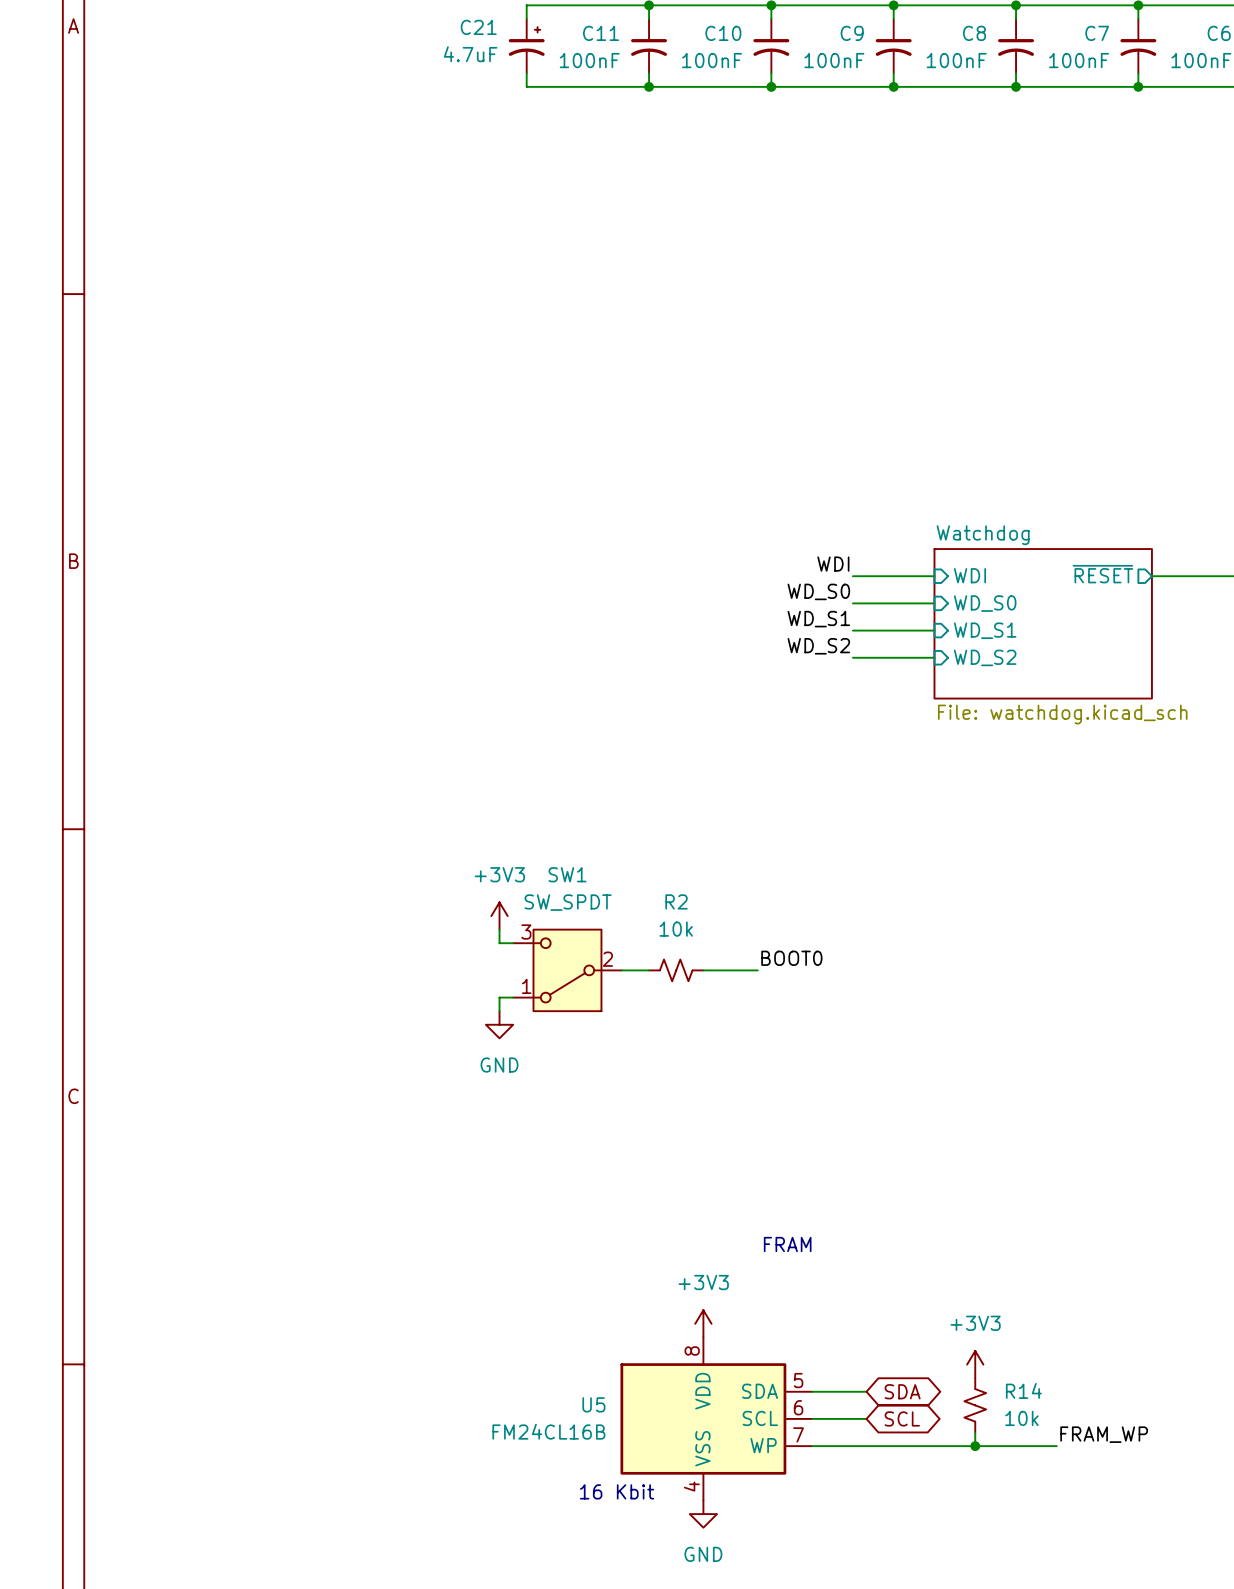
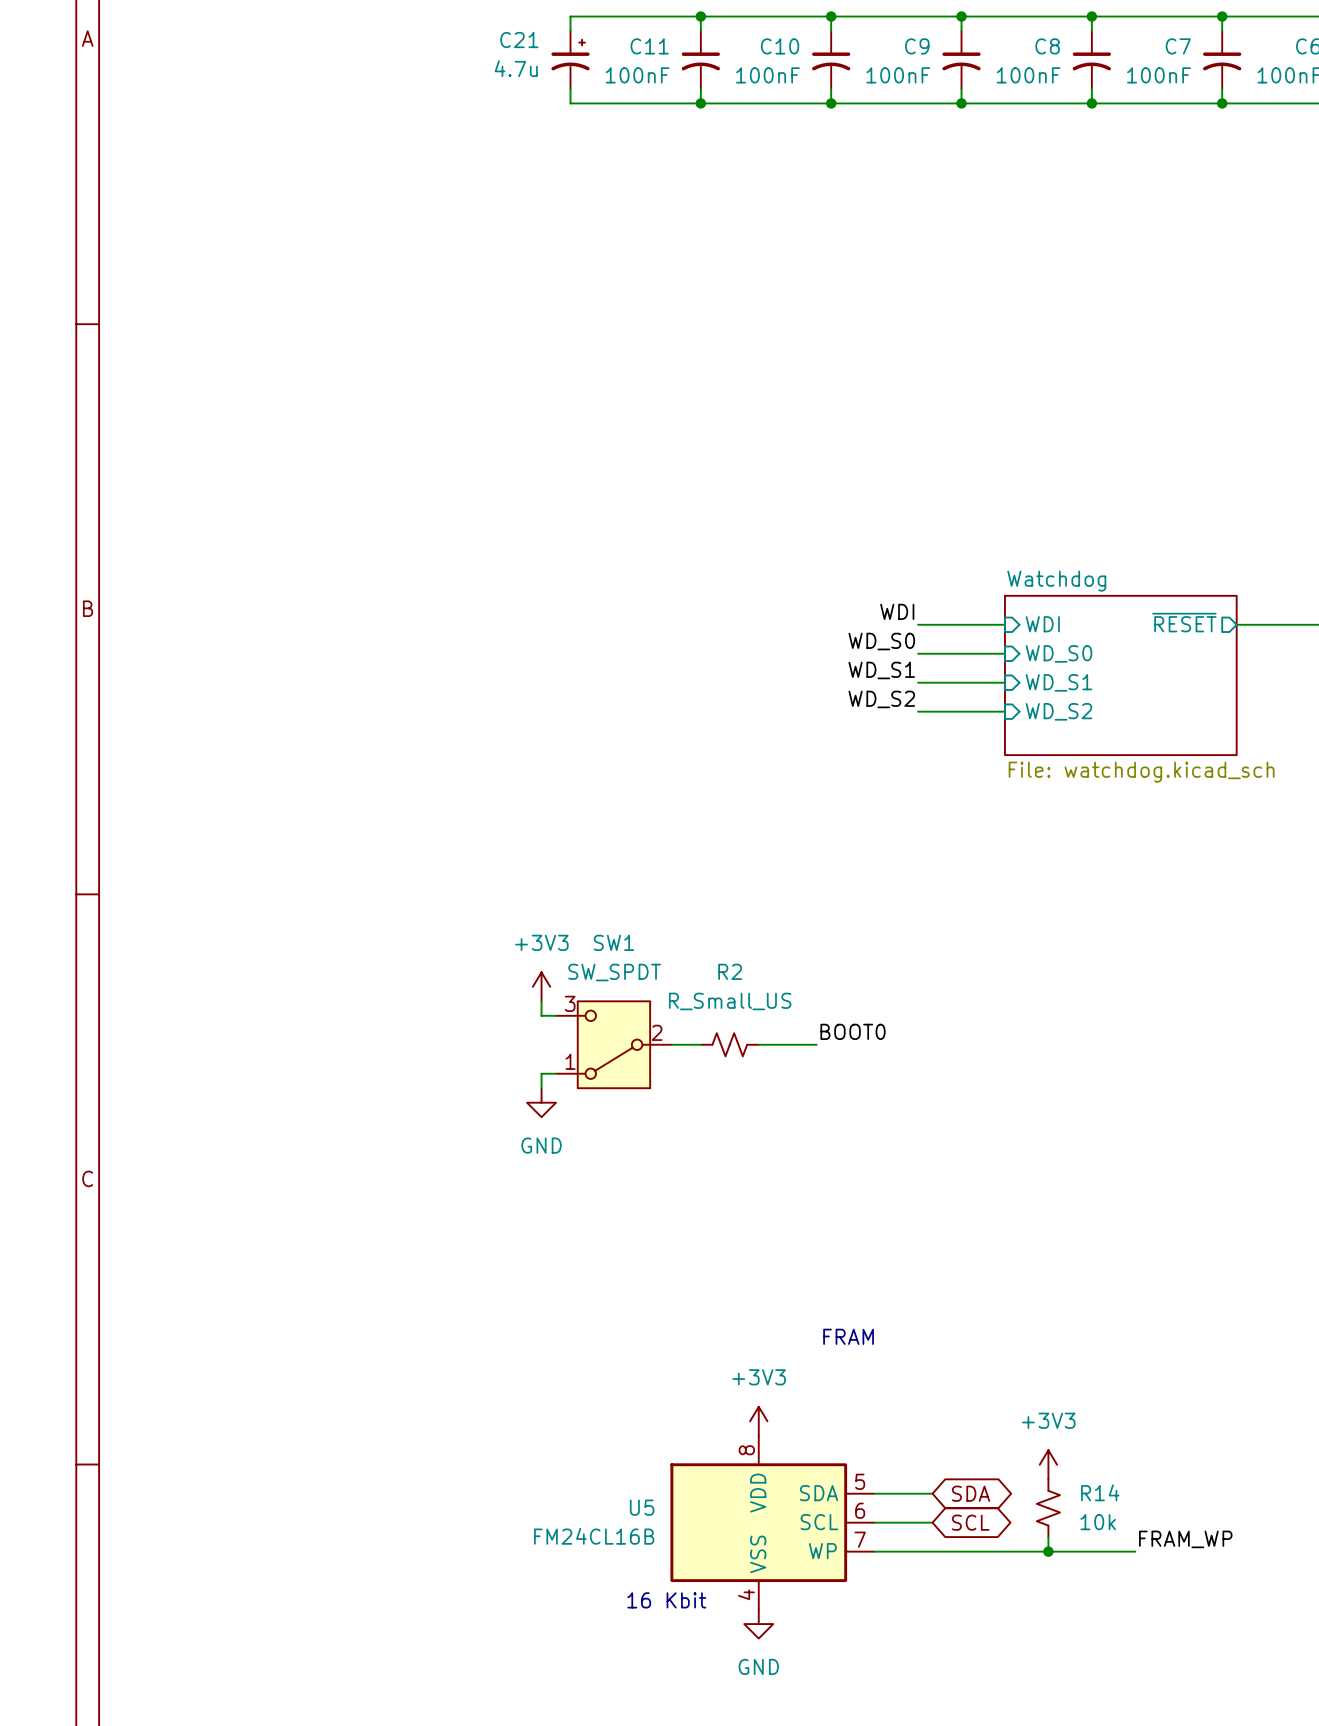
C21 value: 4.7uF (470, 54) -> 4.7u (516, 68)
R2 value: 10k (676, 929) -> R_Small_US (730, 1001)

